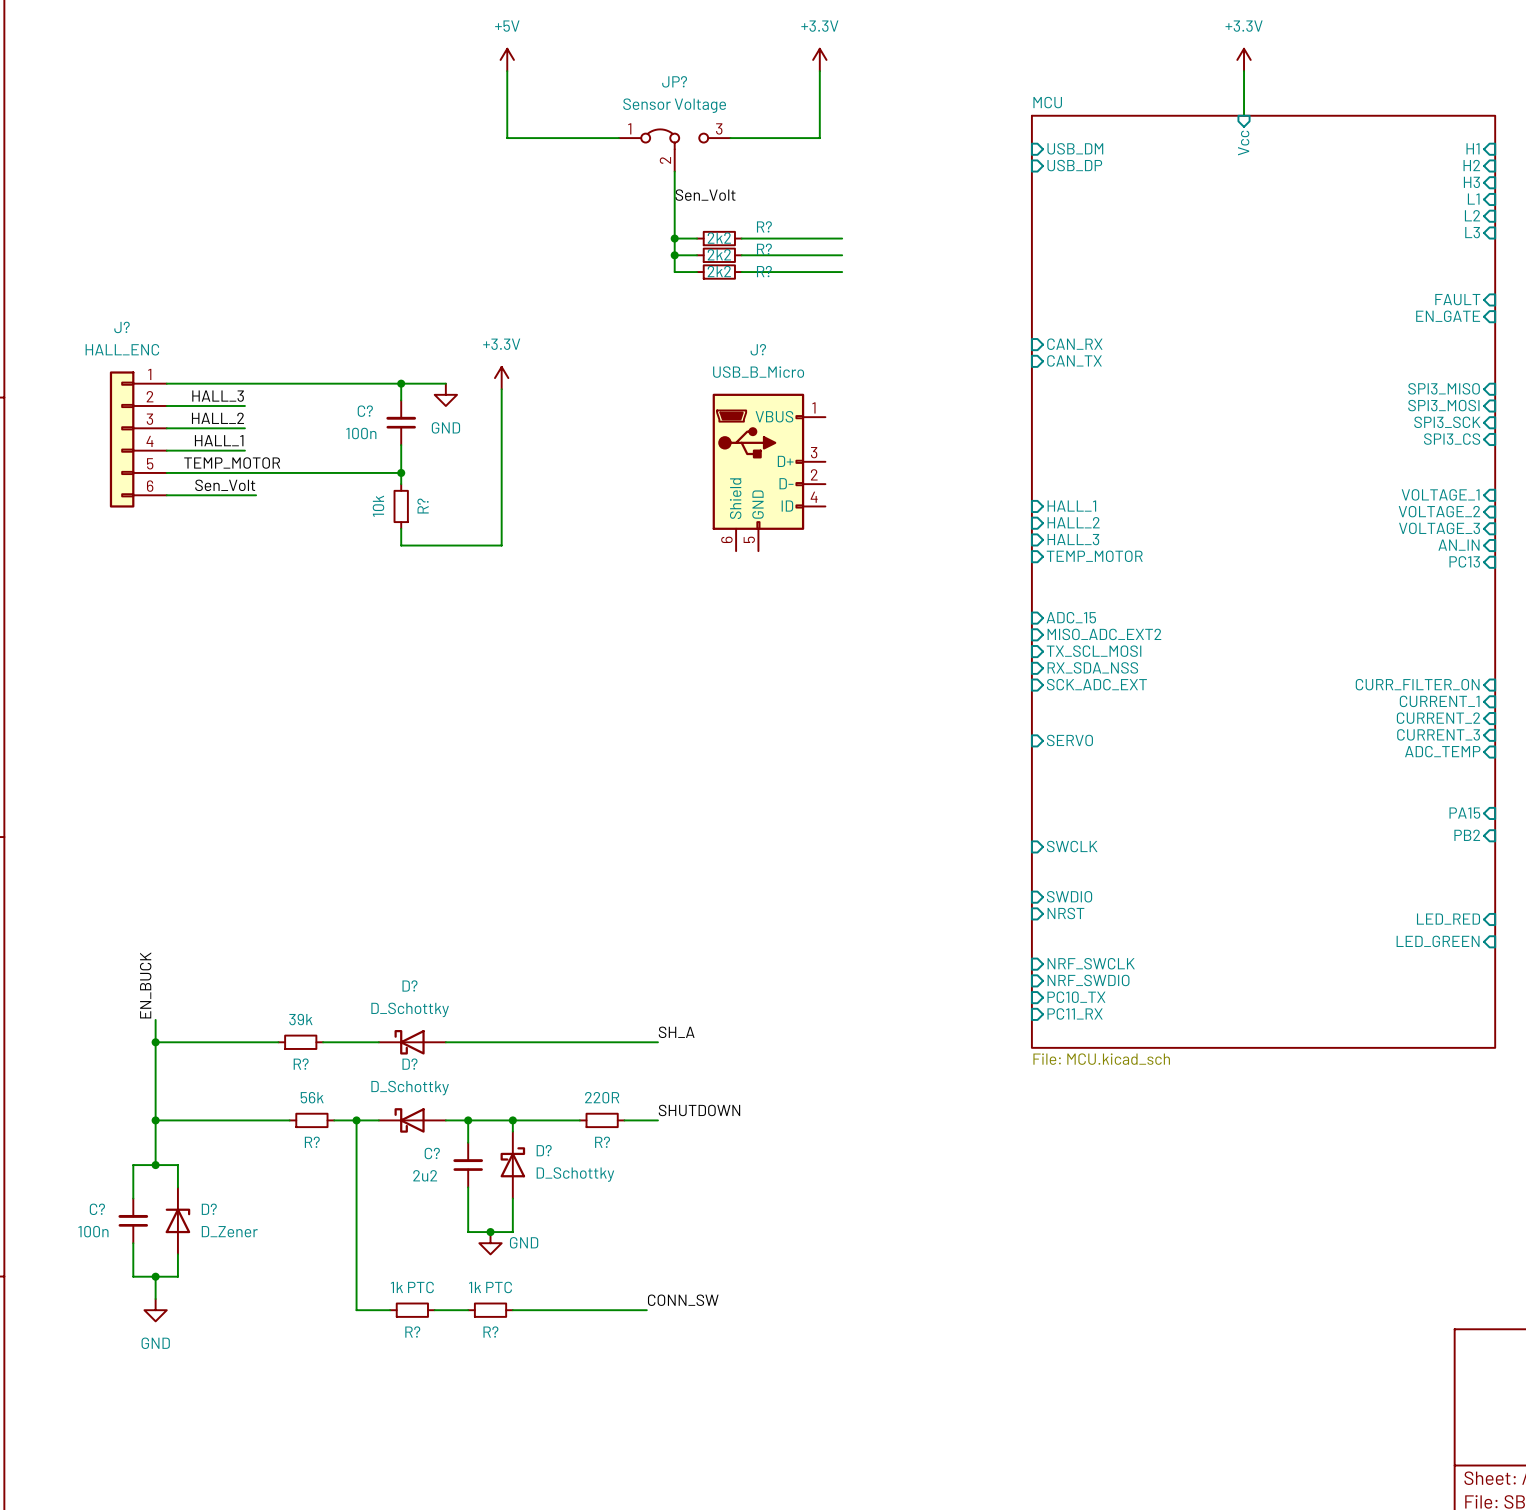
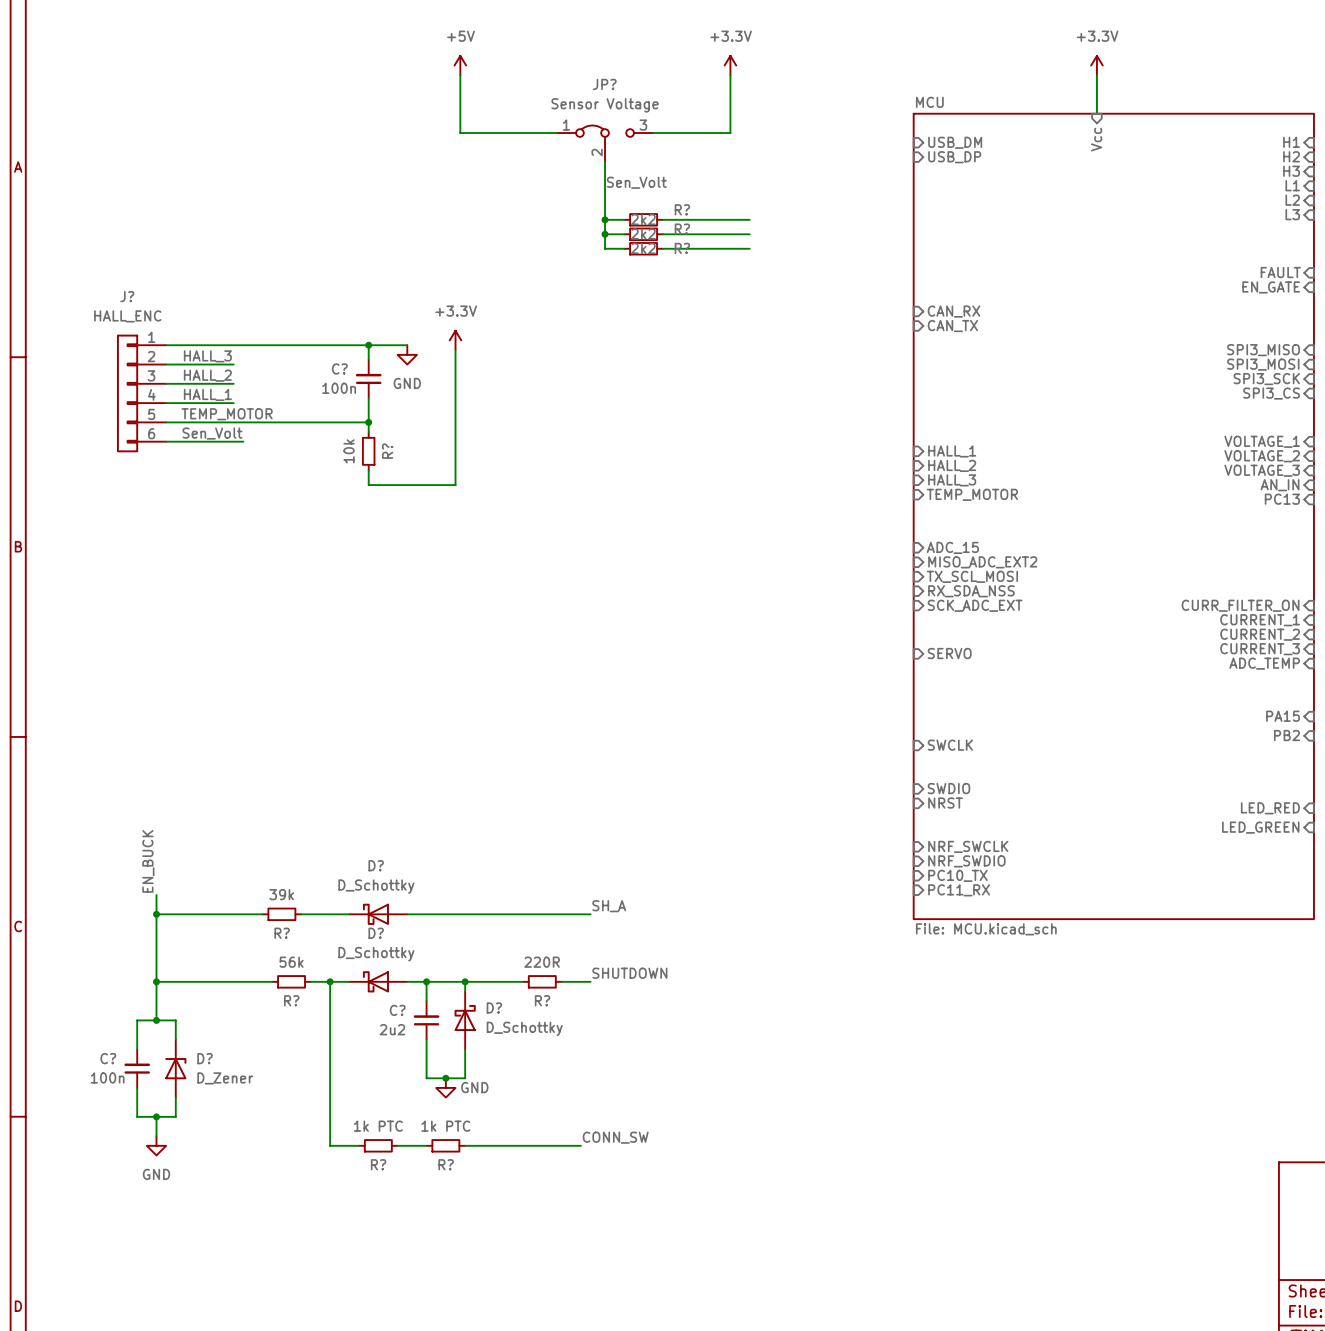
J?: USB_B_Micro (769, 472) -> none

